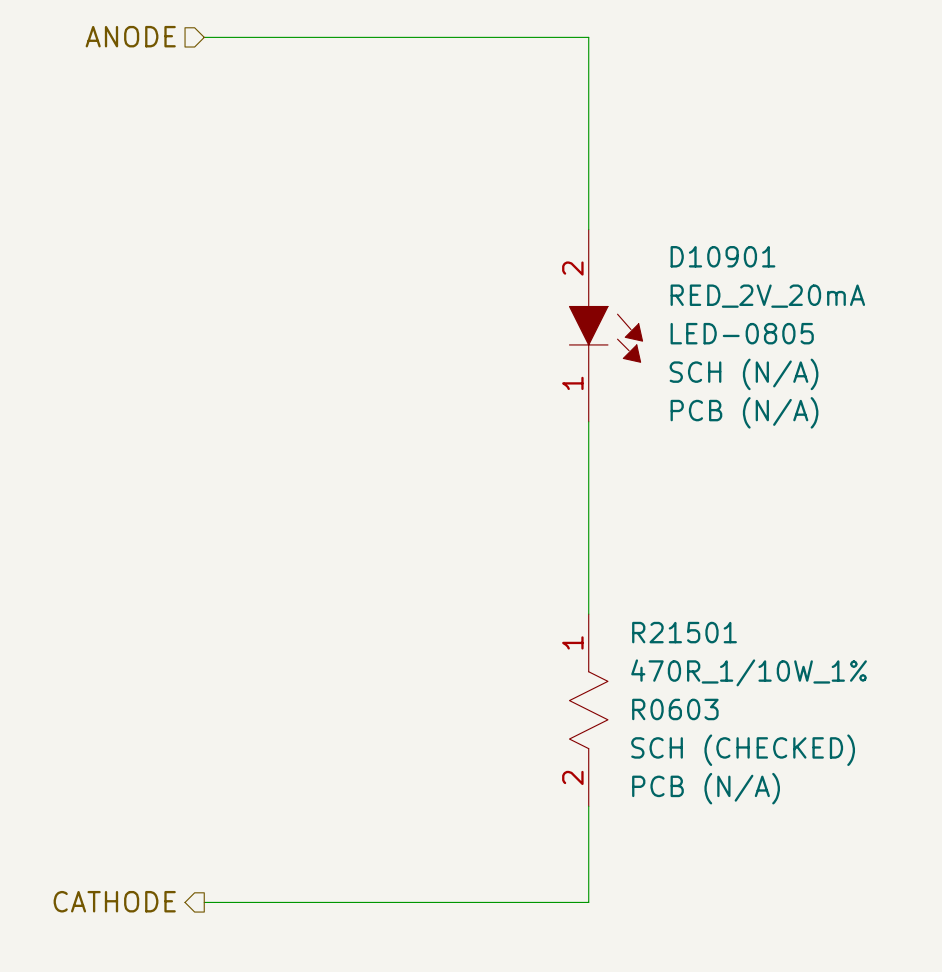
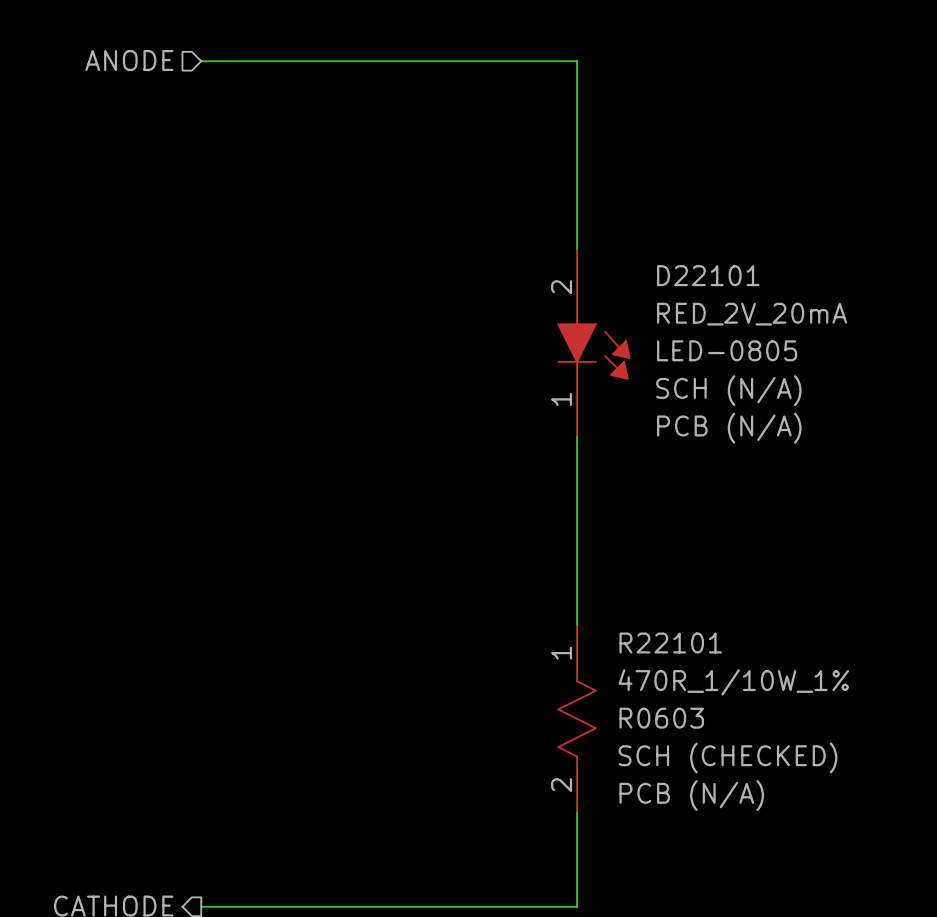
D10901 name: D10901 (722, 256) -> D22101 (708, 275)
R21501 name: R21501 (684, 632) -> R22101 (670, 643)

